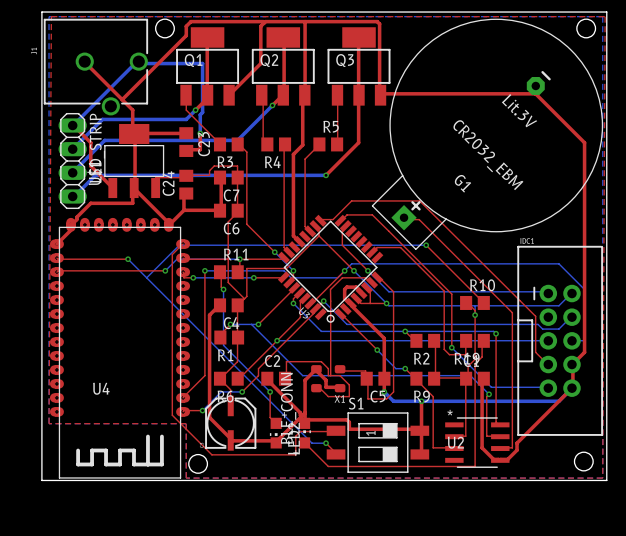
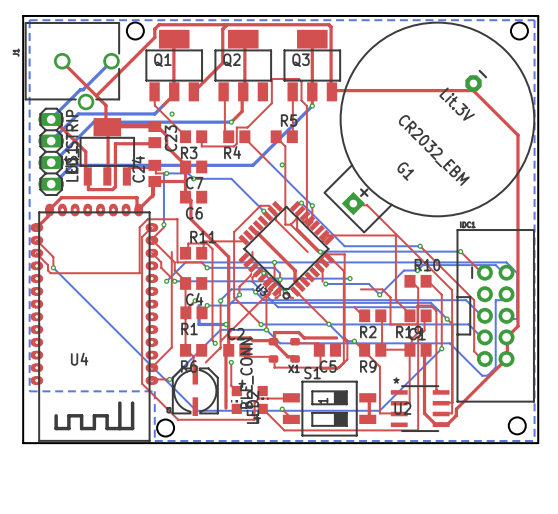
top zone outline: (51, 16) (605, 16) (602, 478) (186, 478) (186, 423) (49, 423) (51, 16) -> none
top track: (305, 21) (302, 145) (293, 154) (293, 235) (299, 241) -> none
top track: (283, 37) (284, 93) (272, 105) -> (243, 39) (244, 41) (244, 89) (242, 92) (242, 111) (231, 122)
top track: (359, 37) (358, 142) (326, 175) -> (312, 39) (312, 105)
bottom track: (272, 105) (237, 140) (104, 140) (72, 172) -> (231, 122) (93, 122) (51, 162)
via position: (272, 105) -> (231, 122)
via: (195, 110) -> none
via: none -> (312, 105)
via: none -> (172, 114)
top track: (72, 125) (90, 142) (90, 166) (112, 188) -> (51, 119) (85, 151) (85, 176) (88, 178) (88, 189) (112, 189) (115, 186) (115, 143) (154, 142)
bottom track: (72, 125) (138, 61) (139, 63) (202, 63) (202, 112) (200, 114) (200, 133) -> (51, 119) (111, 61)
top track: none -> (107, 124) (153, 124) (154, 126) (155, 124) (166, 135) (166, 146) (185, 165) (185, 197) (190, 200) (190, 219) (228, 257) (228, 350) (225, 354) (225, 408)
top track: (200, 133) (200, 149) (186, 150) -> none
via: (200, 133) -> none
top track: (237, 144) (246, 152) (246, 224) (274, 252) -> (201, 136) (201, 146) (234, 146) (236, 143) (236, 127) (247, 127) (271, 103) (271, 79) (298, 79) (301, 81) (301, 100) (306, 105) (306, 219) (302, 222)
top track: (285, 144) (284, 247) (288, 252) -> (244, 136) (269, 162)
top track: (319, 144) (305, 159) (305, 226) (309, 231) -> (276, 136) (285, 146) (285, 224) (290, 224)
bottom track: none -> (269, 162) (312, 205)
bottom track: (326, 175) (95, 175) (72, 196) -> (312, 105) (252, 165) (72, 165) (51, 184)
top track: (220, 177) (221, 210) (183, 210) (168, 224) (134, 188) (132, 203) (90, 203) (76, 217) (69, 226) (69, 231) (56, 244) -> (185, 181) (153, 181) (153, 194) (138, 210) (136, 208) (136, 197) (61, 197) (47, 211) (47, 216) (36, 227)
via: none -> (166, 173)
top track: (155, 188) (156, 177) (209, 175) (209, 170) (214, 166) (237, 166) (237, 212) (228, 221) (228, 282) (244, 298) -> (126, 176) (128, 176) (128, 168) (153, 168) (154, 165) (155, 173) (166, 173)
top track: none -> (193, 178) (201, 178)
via: none -> (193, 178)
bottom track: none -> (301, 203) (344, 246) (420, 246)
via: none -> (301, 203)
top track: (320, 220) (333, 219) (351, 200) (419, 200) (535, 316) (535, 352) (548, 364) -> none
top track: (340, 220) (347, 214) (372, 214) (451, 294) (451, 347) -> none
top track: none -> (312, 205) (312, 221) (307, 227)
via: none -> (312, 205)
bottom track: none -> (263, 211) (231, 178) (193, 178) (188, 173) (163, 173) (163, 224)
via: none -> (263, 211)
top track: none -> (275, 212) (269, 205) (260, 205) (234, 232) (234, 297) (261, 324)
top track: none -> (298, 217) (290, 224)
top track: (319, 235) (286, 268) (246, 268) (246, 296) (237, 305) (237, 361) (220, 378) (230, 389) (230, 405) -> (163, 224) (163, 227) (151, 240) (174, 262) (174, 270) (185, 281) (185, 350) (193, 356) (195, 375)
via: none -> (163, 224)
top track: none -> (290, 224) (317, 251)
top track: (426, 245) (483, 302) -> (441, 348) (441, 294) (426, 281)
bottom track: (426, 245) (179, 245) (146, 277) -> none
via: (426, 245) -> none
top track: none -> (256, 232) (295, 270) (295, 280) (302, 288)
bottom track: (274, 252) (293, 270) -> none
via: (274, 252) -> none
top track: (372, 252) (377, 247) (400, 247) (444, 291) (444, 349) (449, 354) (465, 354) (466, 340) -> (322, 241) (328, 235) (395, 235) (395, 300) (409, 315)
top track: (56, 258) (128, 259) -> (36, 240) (53, 257) (53, 267)
top track: (183, 258) (228, 259) -> none
bottom track: (128, 259) (312, 443) (326, 443) -> none
via: (128, 259) -> none
bottom track: (239, 259) (176, 259) (165, 270) -> none
via: (239, 259) -> none
top track: none -> (420, 246) (474, 300) (474, 351) (484, 363)
via: none -> (420, 246)
top track: (165, 270) (56, 272) -> (207, 267) (201, 262) (177, 262) (177, 219) (147, 219) (139, 227) (139, 273) (50, 273) (47, 270) (47, 265) (36, 253)
via: (165, 270) -> none
bottom track: (204, 270) (284, 270) (291, 277) (337, 277) (351, 263) (558, 263) (584, 289) (584, 340) (571, 340) -> none
via: (204, 270) -> none
via: (293, 270) -> none
top track: (344, 270) (310, 303) -> none
via: (344, 270) -> none
bottom track: (353, 270) (388, 305) (558, 305) (571, 293) -> none
via: (353, 270) -> none
bottom track: none -> (317, 251) (460, 251)
bottom track: (367, 270) (388, 291) (547, 291) (548, 293) -> none
top track: none -> (460, 251) (484, 276)
via: none -> (460, 251)
top track: (183, 272) (183, 277) (193, 277) -> (151, 253) (161, 262) (161, 267) (174, 281)
top track: (220, 272) (221, 287) (223, 289) -> (185, 253) (188, 251) (188, 243) (207, 243) (212, 248) (212, 340) (215, 343)
bottom track: (193, 277) (253, 277) -> none
via: (193, 277) -> none
top track: (253, 277) (281, 277) -> none
via: (253, 277) -> none
top track: none -> (274, 262) (274, 278) (265, 288)
via: none -> (274, 262)
top track: (372, 282) (365, 277) (342, 277) (330, 289) (330, 375) -> none
top track: (294, 287) (258, 324) -> none
top track: (347, 287) (344, 289) (344, 298) (384, 338) (384, 391) -> none
top track: (347, 287) (356, 287) (361, 293) -> none
bottom track: none -> (53, 267) (196, 410) (379, 410) (441, 348)
via: none -> (53, 267)
bottom track: none -> (207, 267) (274, 267) (279, 273)
via: none -> (207, 267)
bottom track: (223, 289) (223, 345) (270, 391) -> none
via: (223, 289) -> none
via: none -> (417, 270)
top track: none -> (251, 273) (239, 286) (239, 294)
bottom track: none -> (263, 273) (269, 278) (350, 278)
via: none -> (263, 273)
top track: none -> (279, 273) (279, 294) (275, 298)
top track: (304, 298) (300, 301) (300, 317) (237, 378) -> none
top track: (356, 298) (360, 303) (386, 303) -> none
bottom track: none -> (506, 276) (495, 265) (422, 265) (417, 270) (404, 270) (379, 294) (368, 284) (325, 284)
via: none -> (350, 278)
bottom track: (323, 301) (347, 324) (537, 324) (542, 329) (558, 329) (571, 317) -> none
bottom track: none -> (166, 281) (185, 262) (506, 262) (517, 273) (517, 319) (506, 320)
via: none -> (166, 281)
bottom track: none -> (174, 281) (274, 281) (285, 292)
via: none -> (174, 281)
via: (293, 303) -> none
via: (386, 303) -> none
top track: (220, 305) (209, 315) (209, 417) (230, 440) (274, 440) (276, 442) (305, 412) -> none
via: none -> (325, 284)
bottom track: (475, 305) (475, 315) -> none
via: none -> (255, 292)
top track: none -> (285, 292) (293, 298)
via: none -> (285, 292)
via: (475, 315) -> none
top track: none -> (270, 293) (266, 297) (266, 329)
bottom track: none -> (239, 294) (228, 305) (207, 305)
via: none -> (239, 294)
via: none -> (379, 294)
bottom track: none -> (506, 298) (506, 300) (495, 300) (495, 367) (487, 375) (482, 375) (449, 343) (279, 343) (266, 329) (220, 329) (172, 378)
bottom track: none -> (220, 300) (231, 289) (252, 289) (263, 300) (466, 300) (484, 320)
bottom track: (230, 324) (258, 324) -> none
bottom track: (251, 324) (302, 375) (470, 375) (489, 394) -> none
bottom track: none -> (231, 302) (430, 302) (447, 319)
bottom track: none -> (199, 305) (199, 324) (225, 324)
via: none -> (207, 305)
via: (405, 331) -> none
top track: (496, 333) (496, 422) (500, 424) -> (360, 289) (382, 289) (390, 297) (390, 324) (417, 324) (417, 305) (430, 305) (436, 310) (436, 389) (441, 392)
via position: (496, 333) -> (447, 319)
bottom track: (277, 340) (548, 340) -> none
via: (277, 340) -> none
bottom track: (451, 347) (491, 387) (548, 388) -> none
via: (451, 347) -> none
via: none -> (225, 324)
bottom track: none -> (261, 324) (468, 324) (484, 341)
via: none -> (261, 324)
via: none -> (266, 329)
top track: none -> (228, 337) (250, 337) (252, 340) (273, 341)
top track: none -> (336, 337) (304, 337) (298, 332) (274, 332) (273, 341)
via: none -> (215, 343)
top track: (267, 378) (301, 416) -> none
top track: (285, 378) (286, 361) (321, 361) (328, 368) (328, 375) (340, 375) (349, 384) (349, 396) (328, 396) (321, 389) (316, 388) -> (244, 350) (244, 356) (271, 356) (274, 359) (274, 367) (339, 367) (347, 359) (347, 340) (344, 337) (344, 254) (325, 254) (317, 262) (322, 269)
top track: (340, 388) (326, 387) (326, 380) (316, 369) (314, 371) (305, 380) (304, 423) (305, 419) (347, 419) (349, 422) (349, 429) (419, 429) (419, 430) (421, 429) (421, 401) -> (295, 358) (293, 356) (288, 356) (273, 341)
bottom track: (571, 388) (558, 401) (393, 401) (384, 391) -> none
bottom track: (242, 391) (221, 391) (202, 410) -> none
via: (242, 391) -> none
via: (384, 391) -> none
top track: (489, 394) (486, 396) (486, 436) (500, 436) -> (447, 319) (452, 324) (452, 402) (441, 403)
via position: (489, 394) -> (441, 348)
via: (421, 401) -> none

